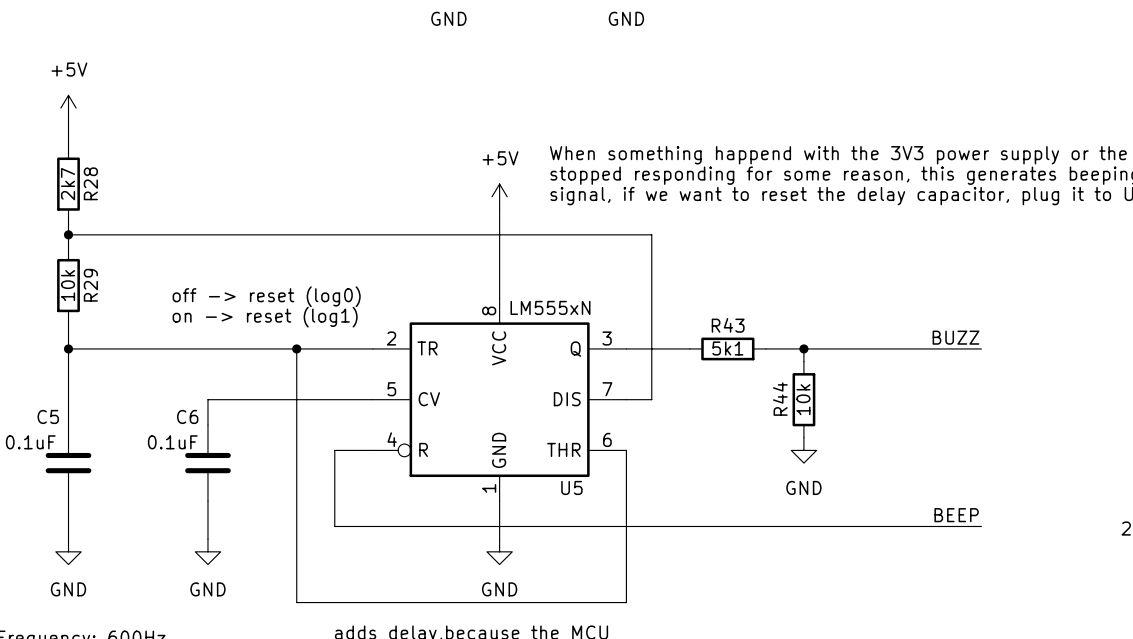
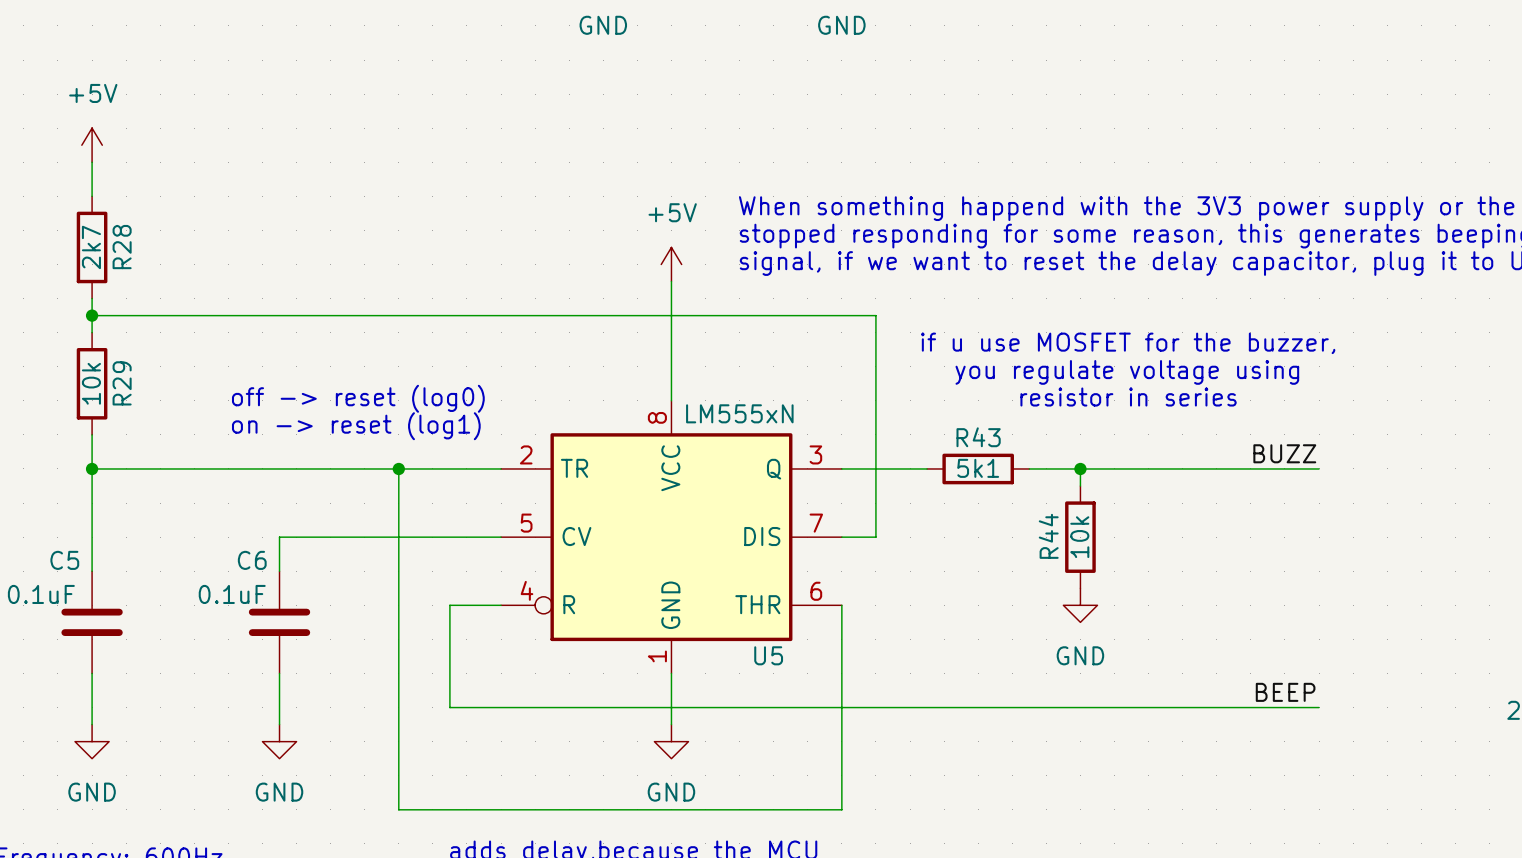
text: none -> if u use MOSFET for the buzzer, (1128, 343)
text: none -> you regulate voltage using (1127, 372)
text: none -> resistor in series (1128, 397)

